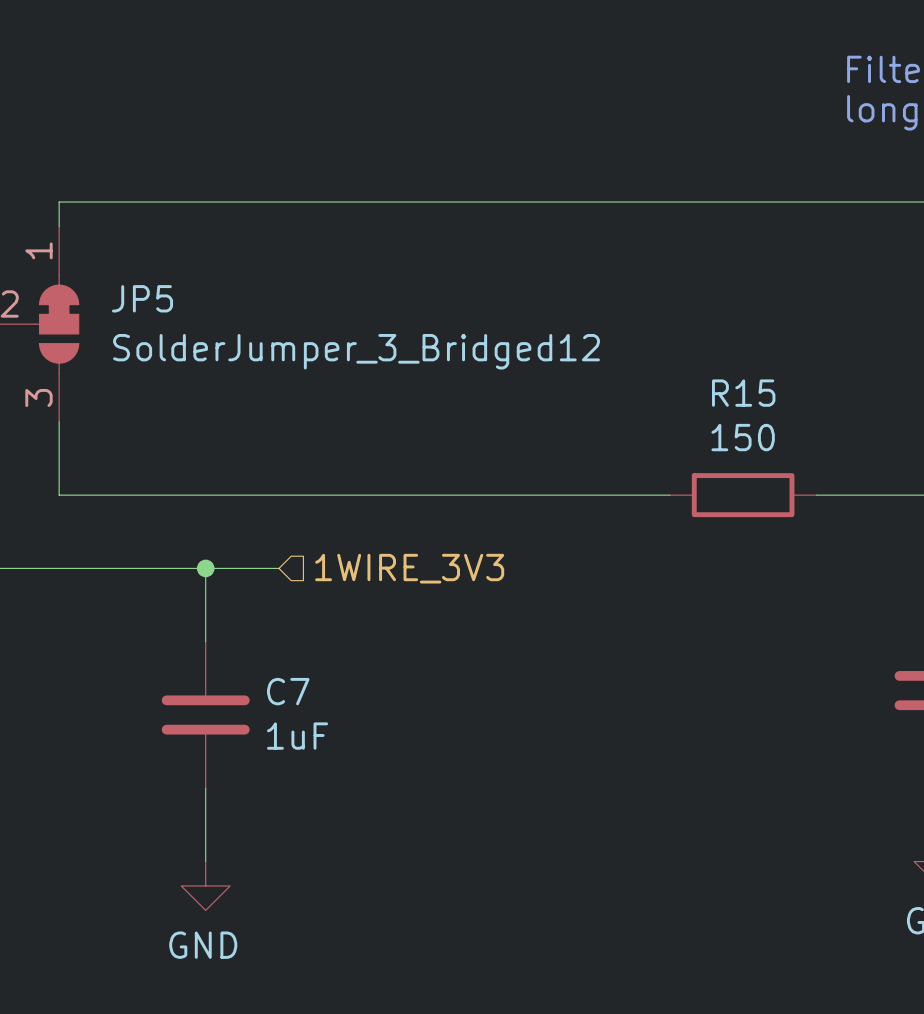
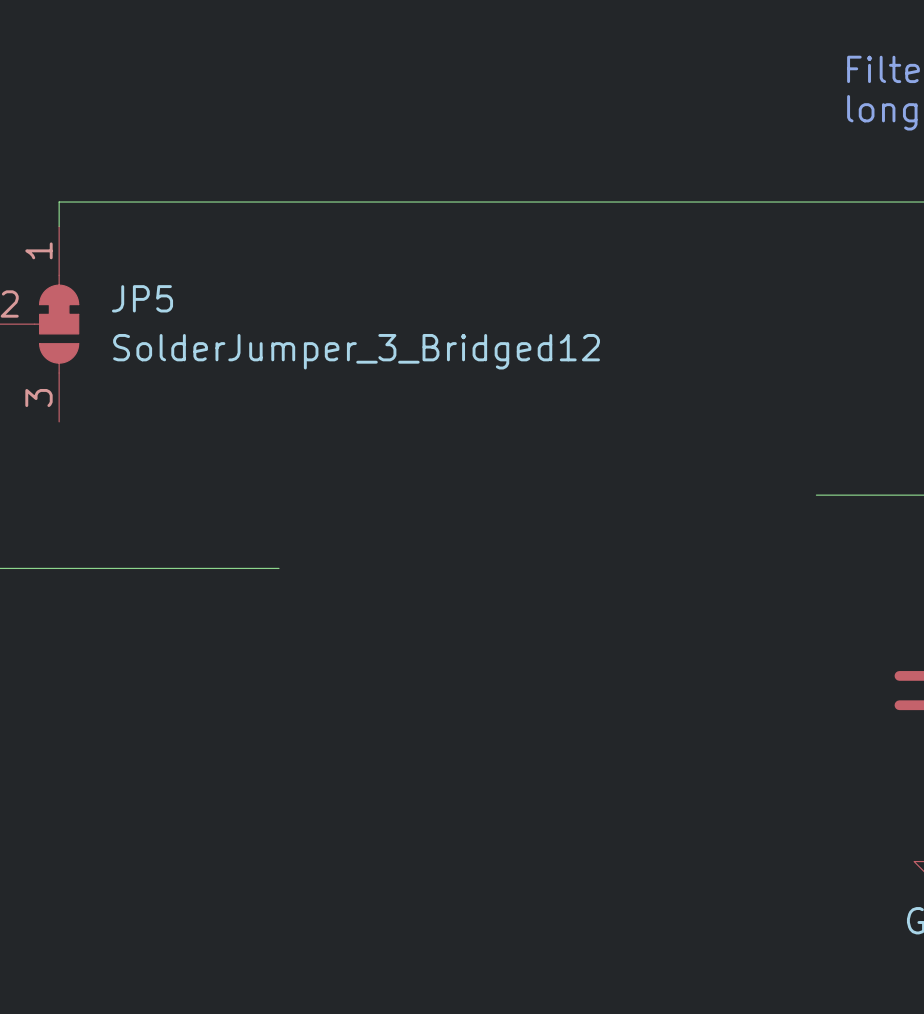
wire: (59, 421) (59, 495) (669, 495) -> none
R15: 150 (743, 495) -> none
wire: (205, 568) (205, 641) -> none
junction: (205, 568) -> none
hierarchical label: 1WIRE_3V3 (409, 568) -> none
C7: 1uF (205, 714) -> none
wire: (205, 788) (205, 861) -> none
power symbol: GND (205, 885) -> none

